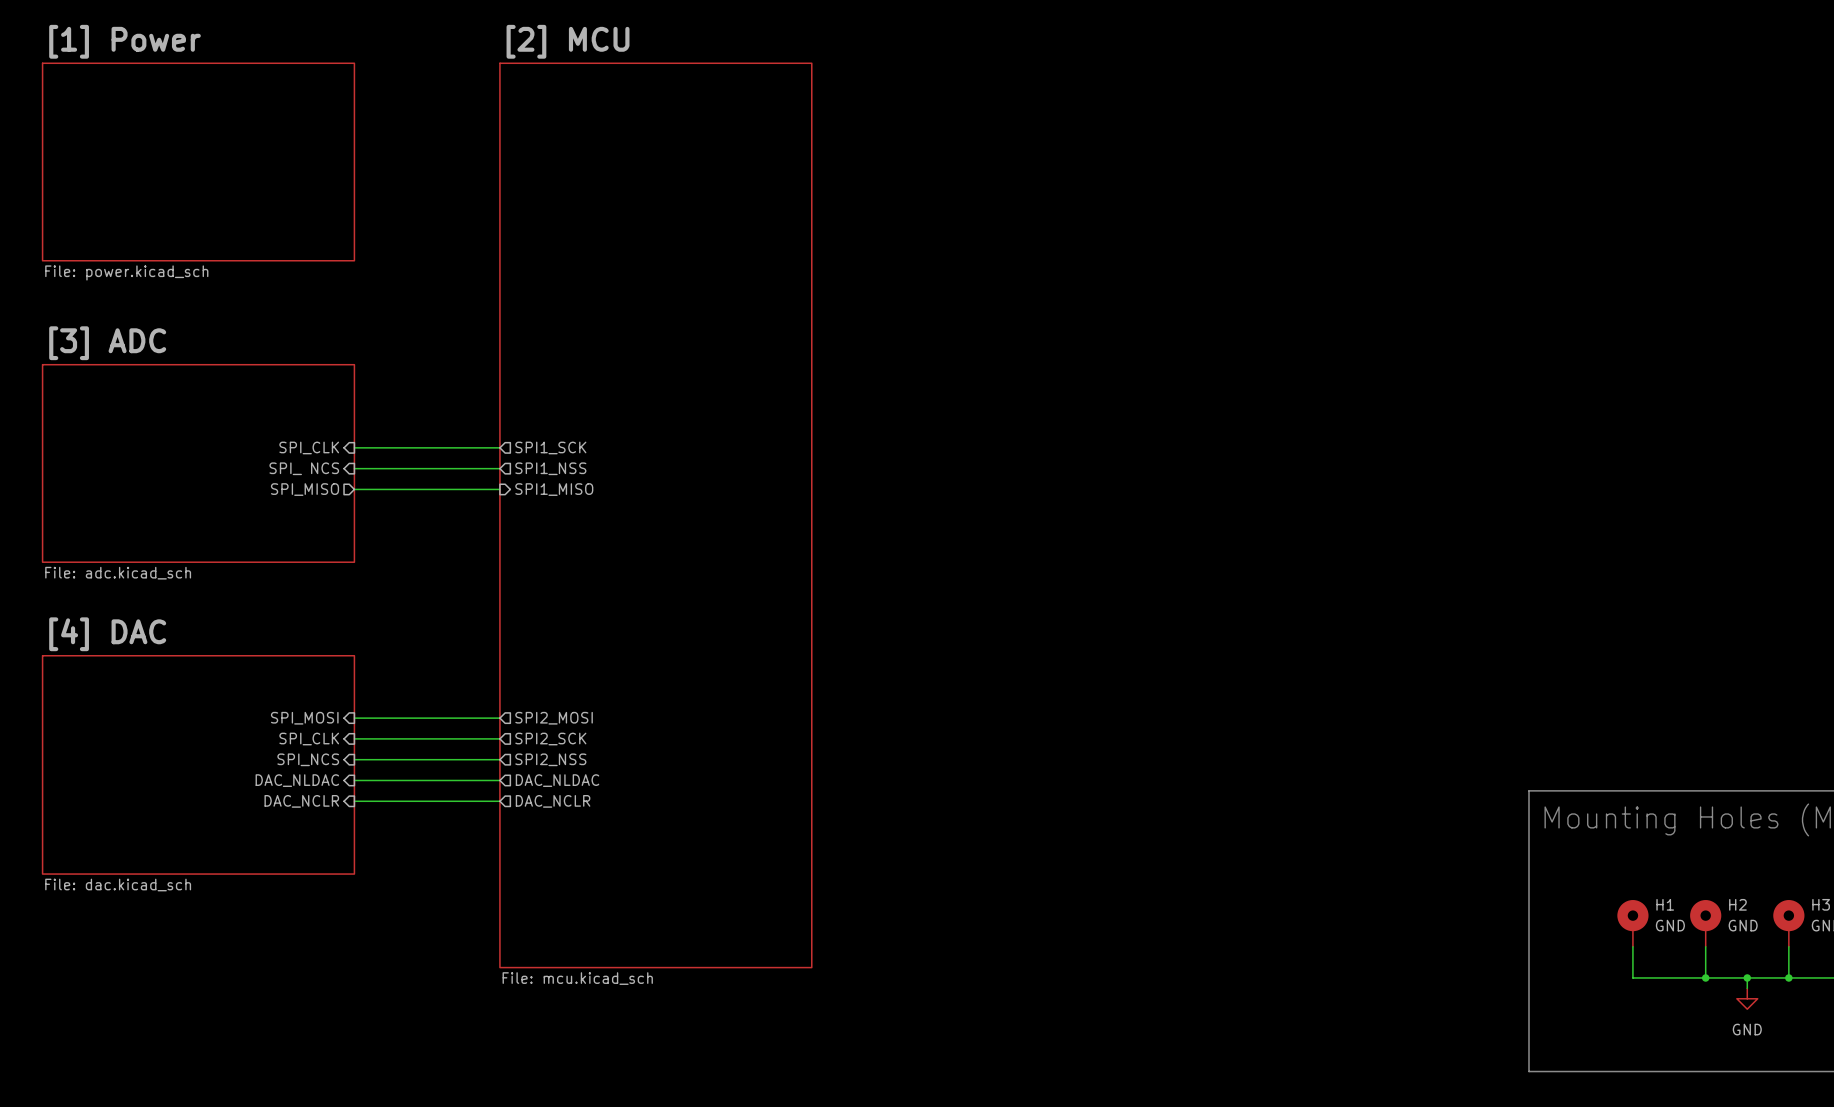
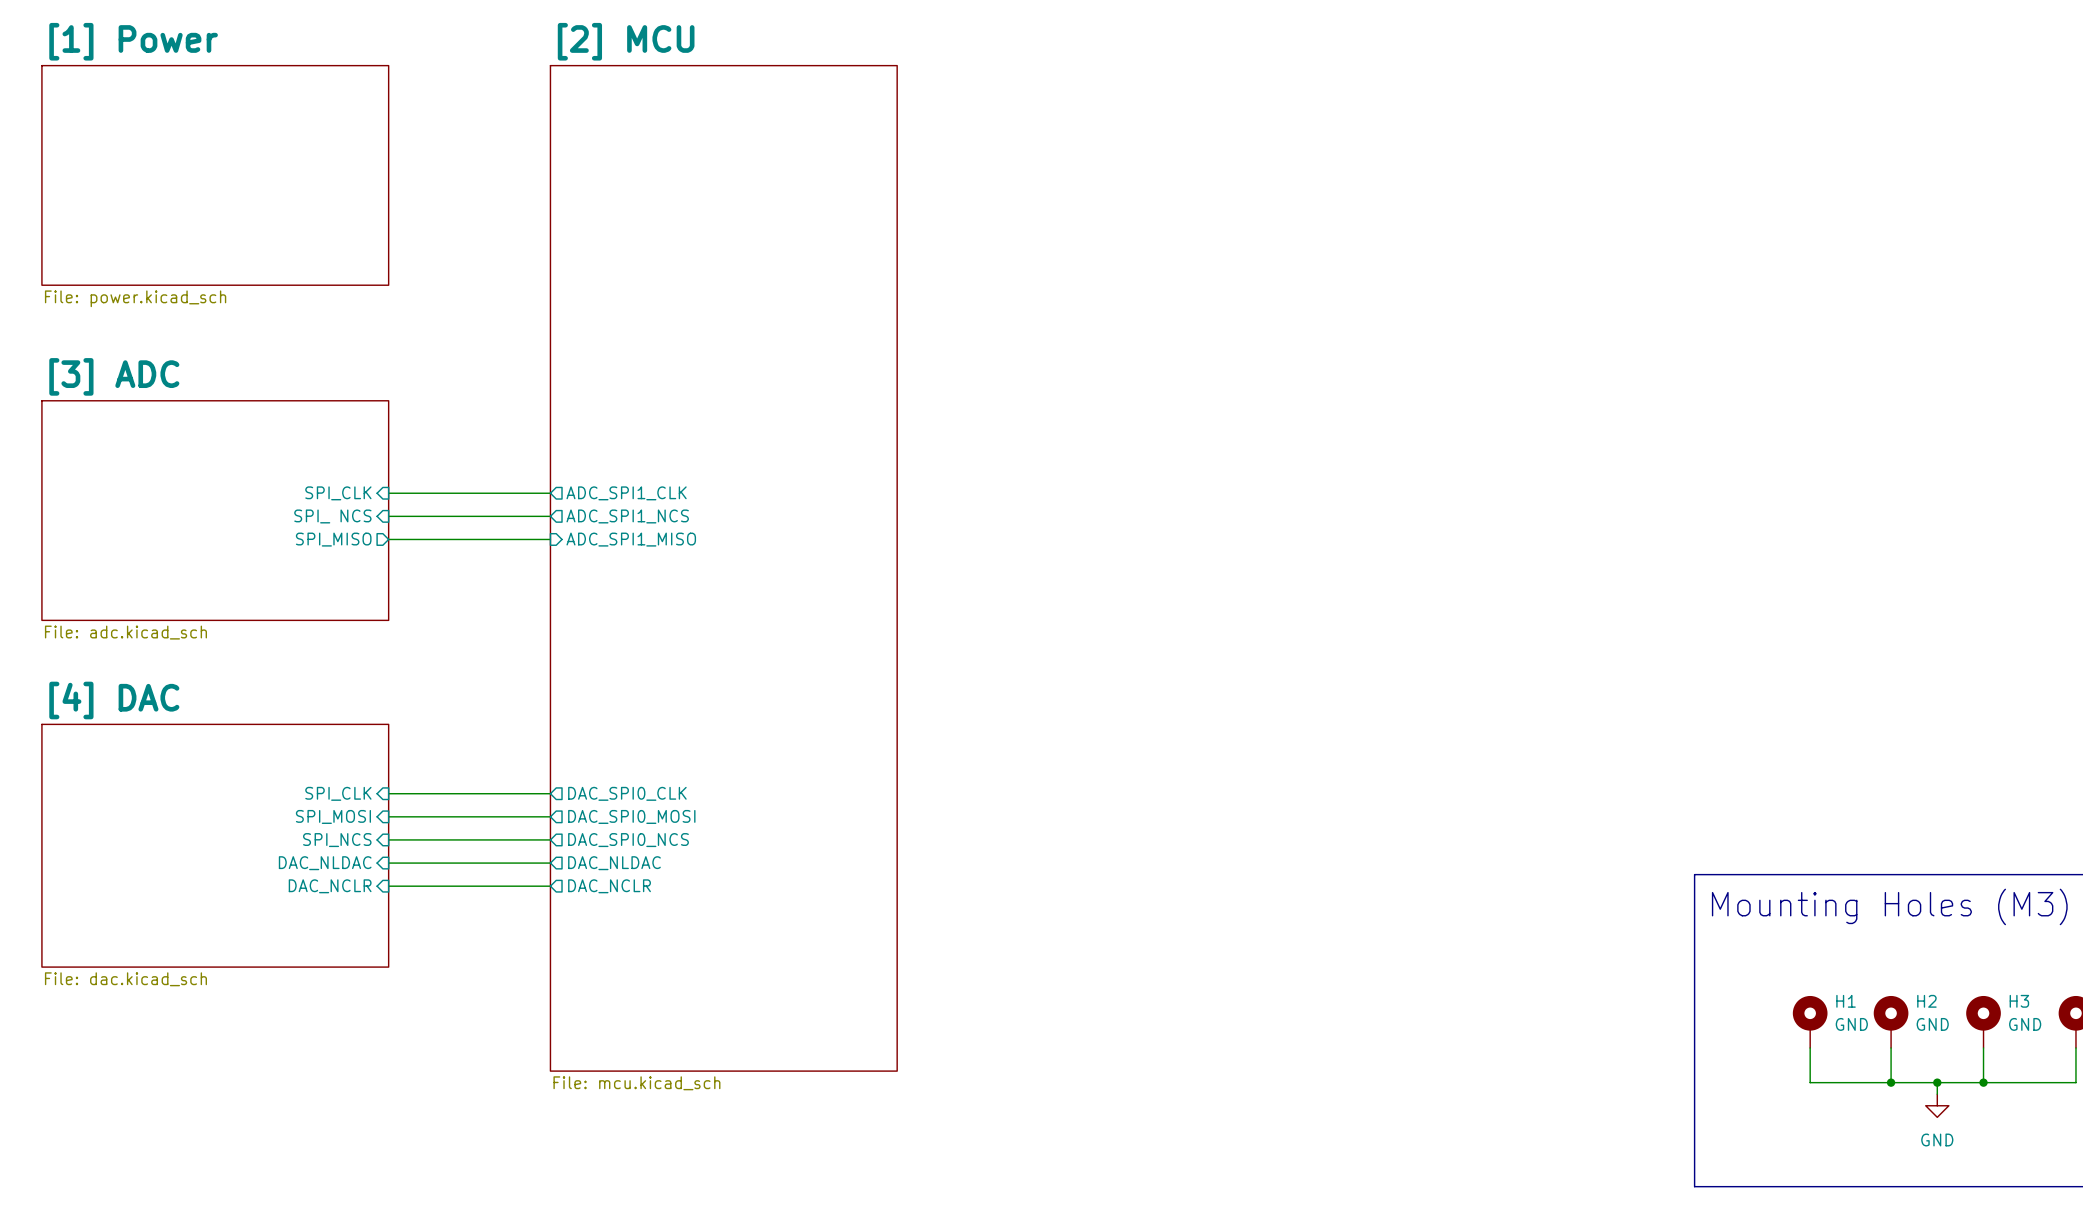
sheet pin: SPI1_SCK (550, 447) -> ADC_SPI1_CLK (626, 493)
sheet pin: SPI1_NSS (550, 468) -> ADC_SPI1_NCS (627, 516)
sheet pin: SPI1_MISO (554, 489) -> ADC_SPI1_MISO (631, 539)
sheet pin: SPI_MOSI (304, 718) -> SPI_CLK (338, 793)
sheet pin: SPI2_MOSI (554, 718) -> DAC_SPI0_CLK (627, 793)
sheet pin: SPI_CLK (309, 739) -> SPI_MOSI (333, 816)
sheet pin: SPI2_SCK (550, 739) -> DAC_SPI0_MOSI (631, 816)
sheet pin: SPI2_NSS (550, 759) -> DAC_SPI0_NCS (628, 840)

